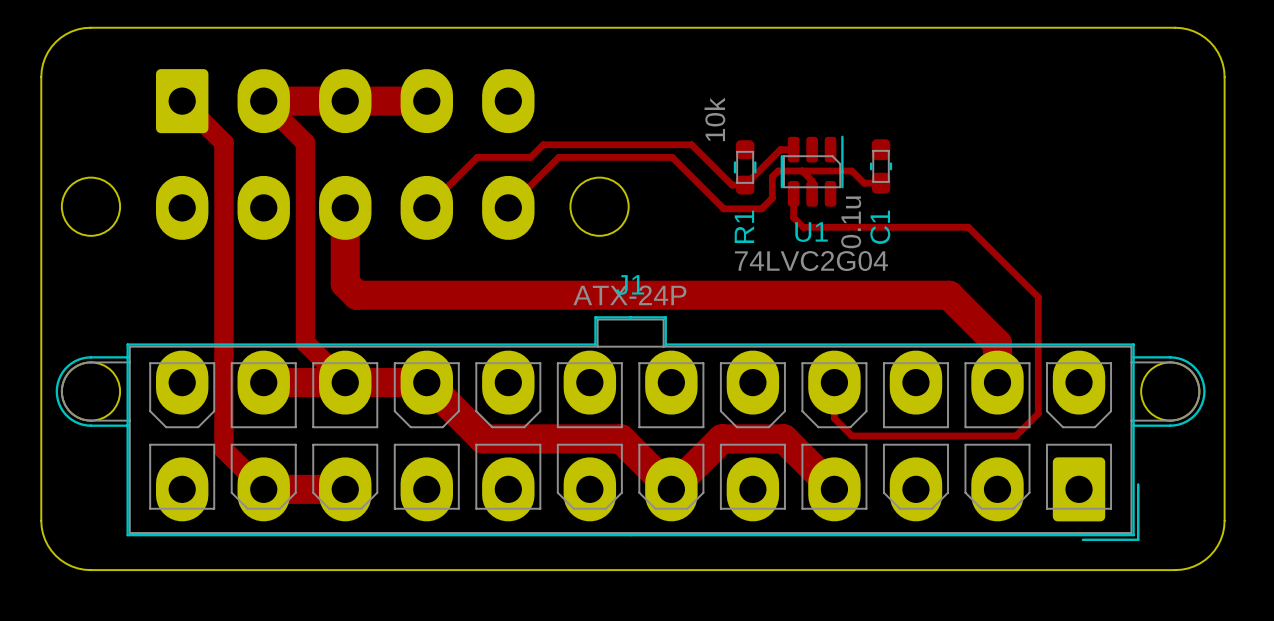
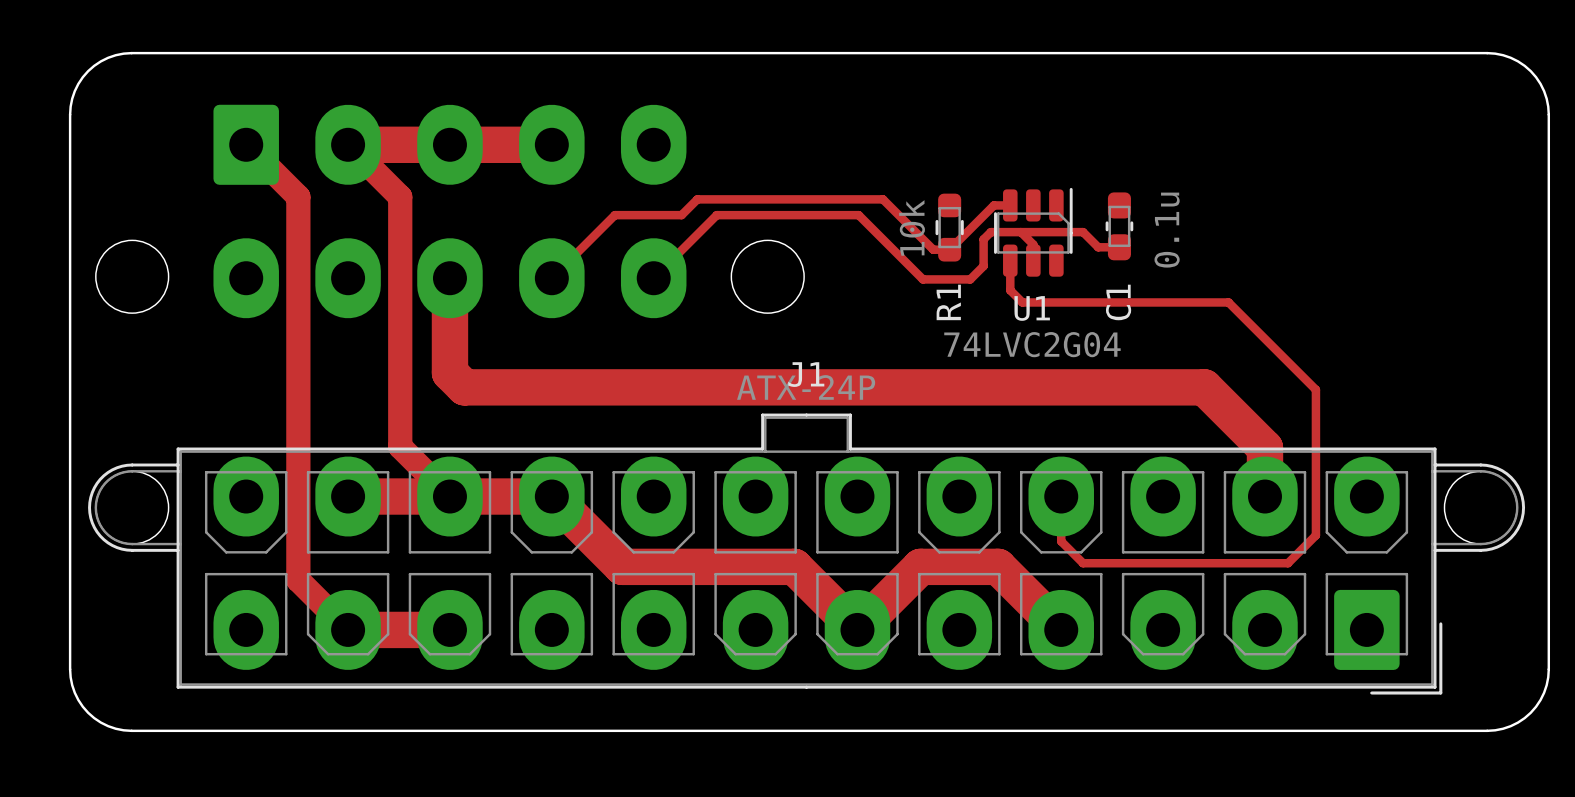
R1 value position: 10k (714, 119) -> 10k (912, 227)
C1 value position: 0.1u (851, 222) -> 0.1u (1167, 230)

